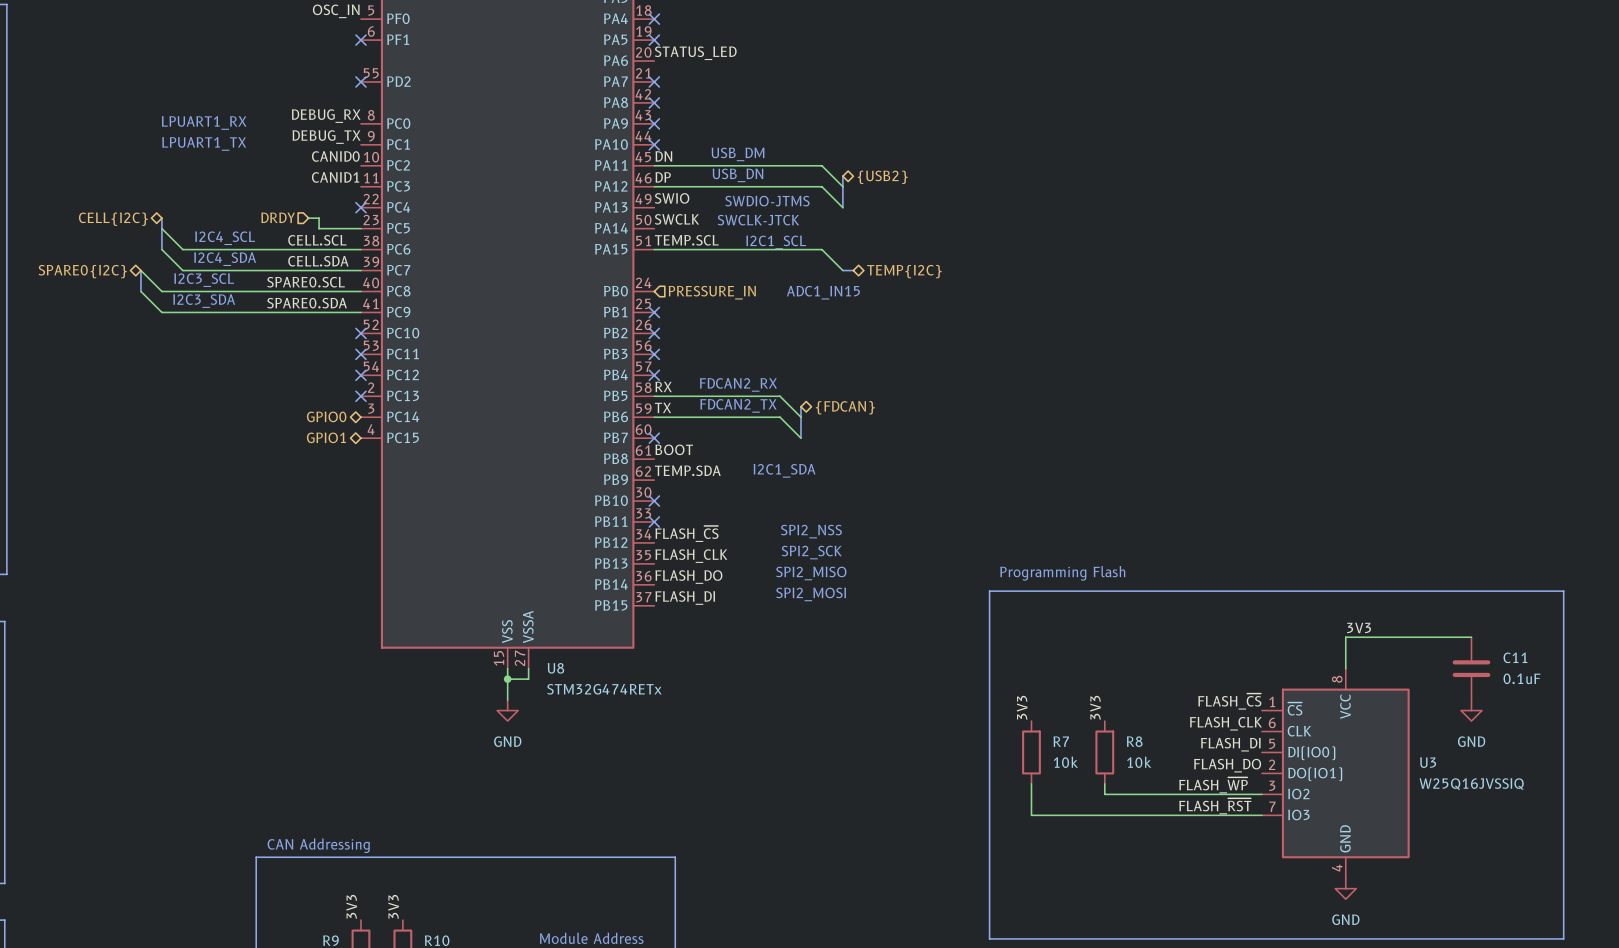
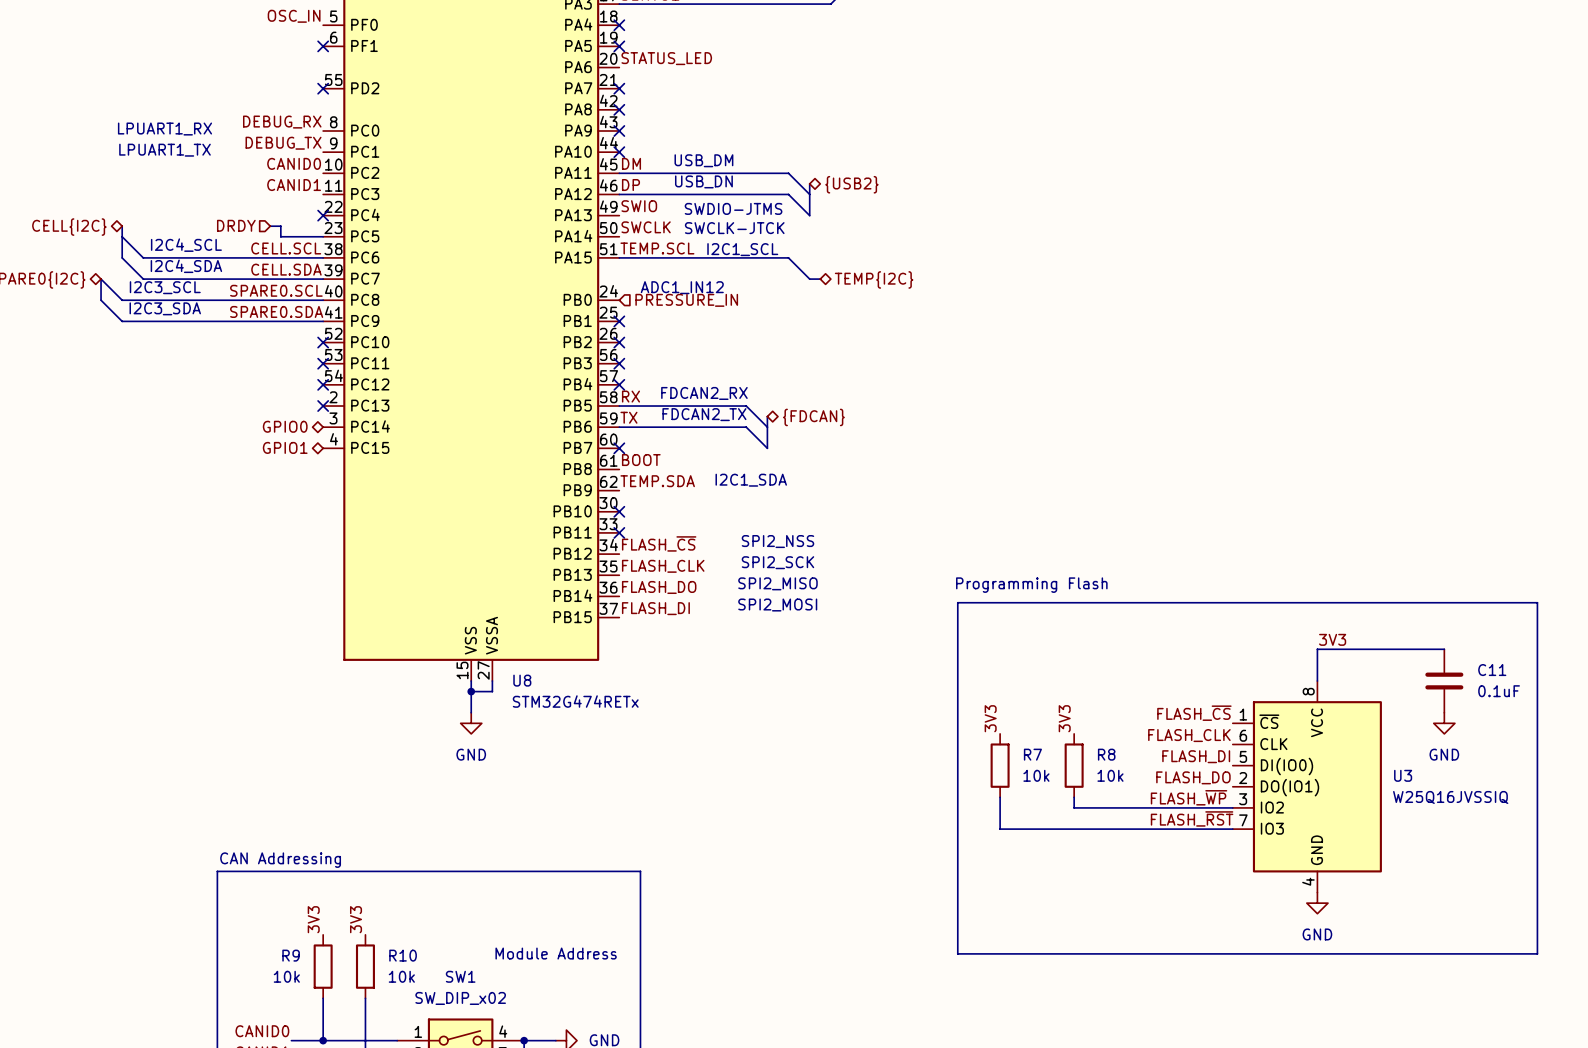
label: DN (663, 156) -> DM (631, 163)
text: none -> ADC1_IN12 (682, 287)
text: ADC1_IN15 (823, 292) -> none

